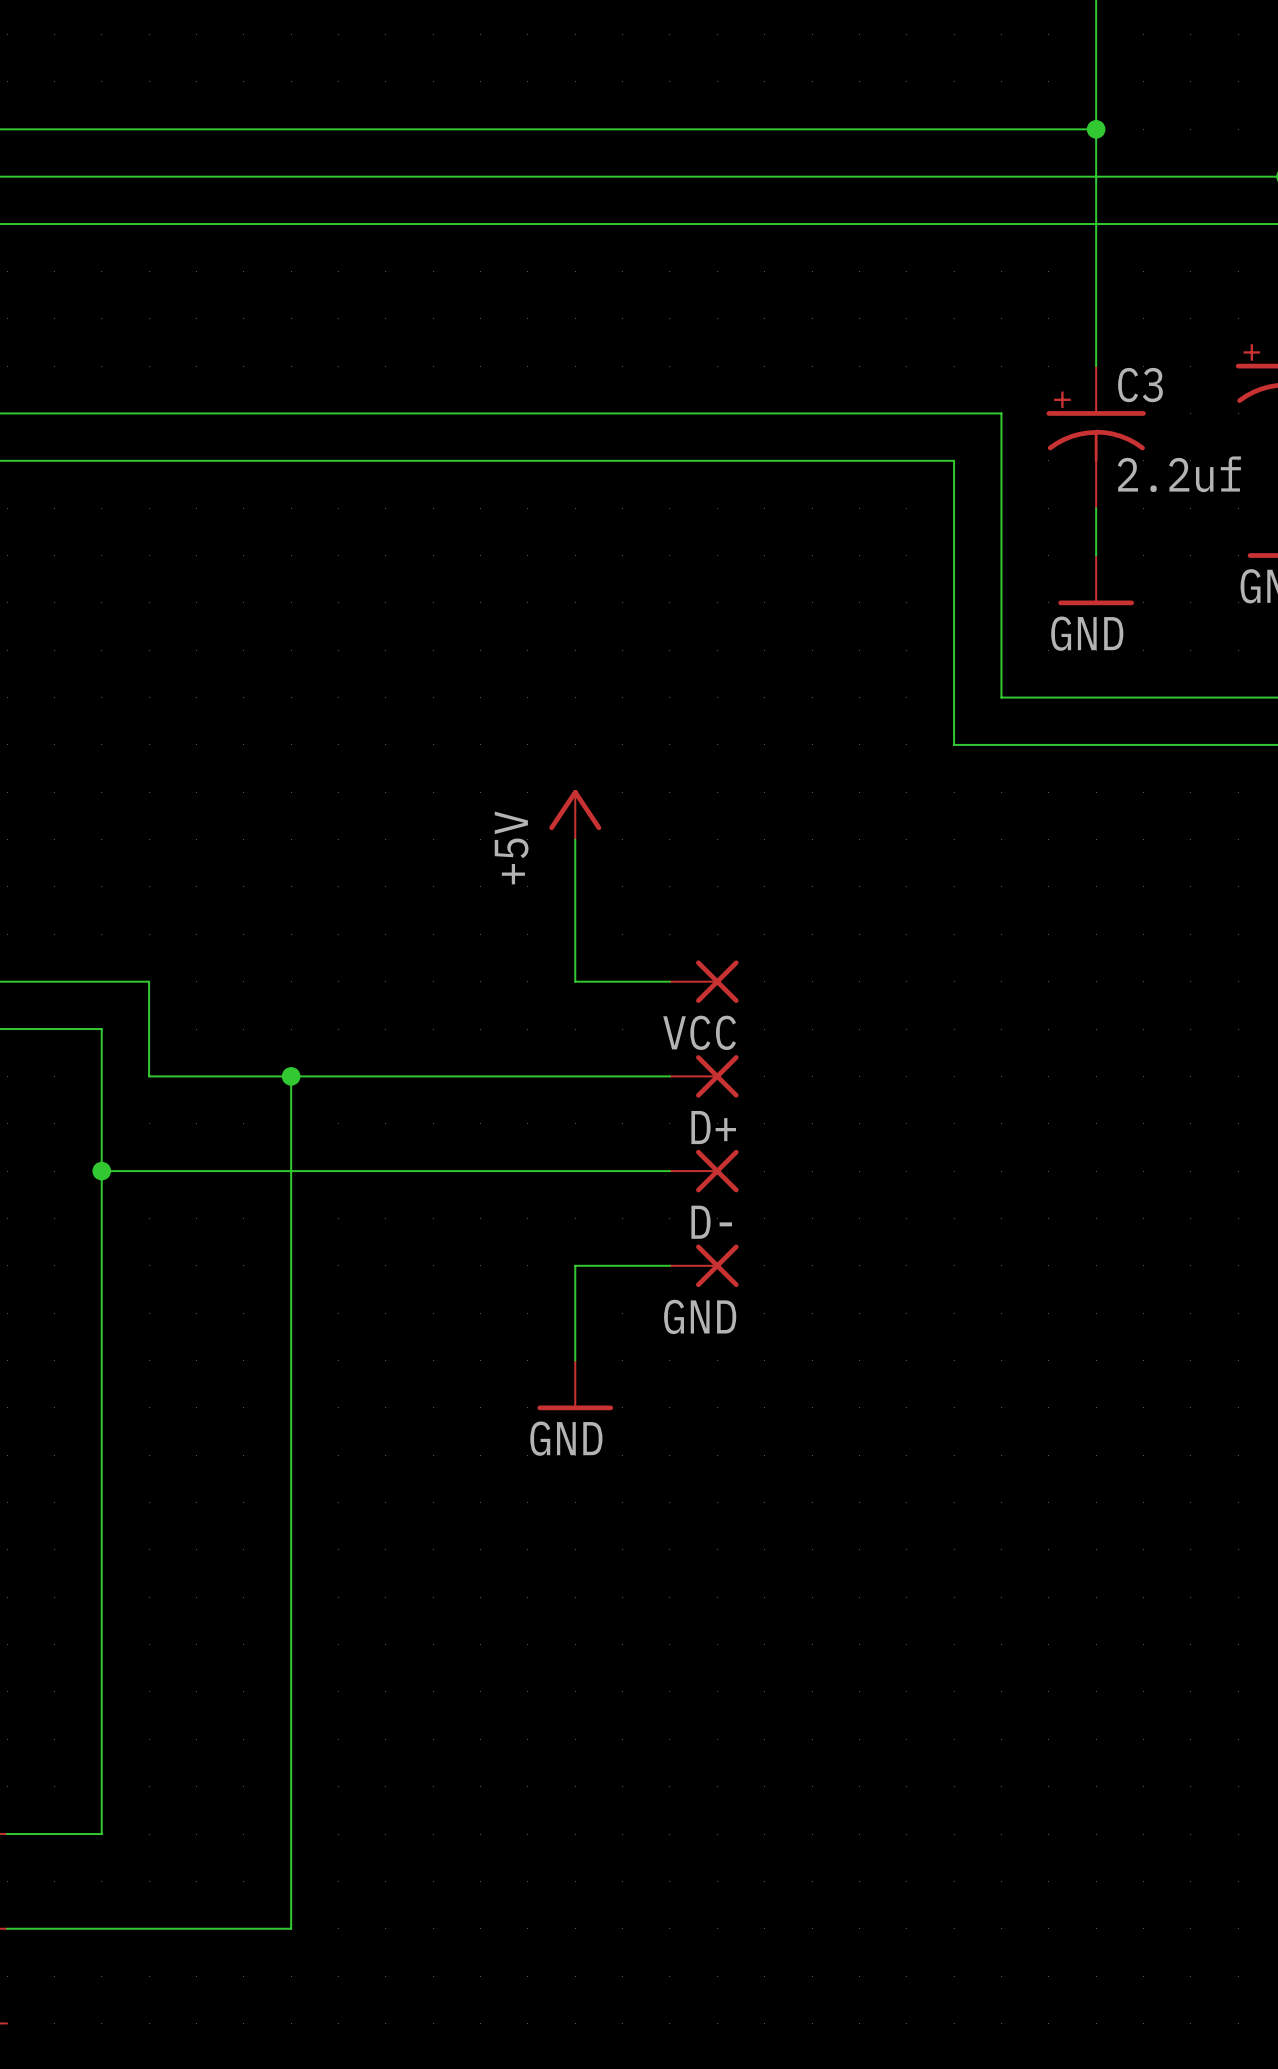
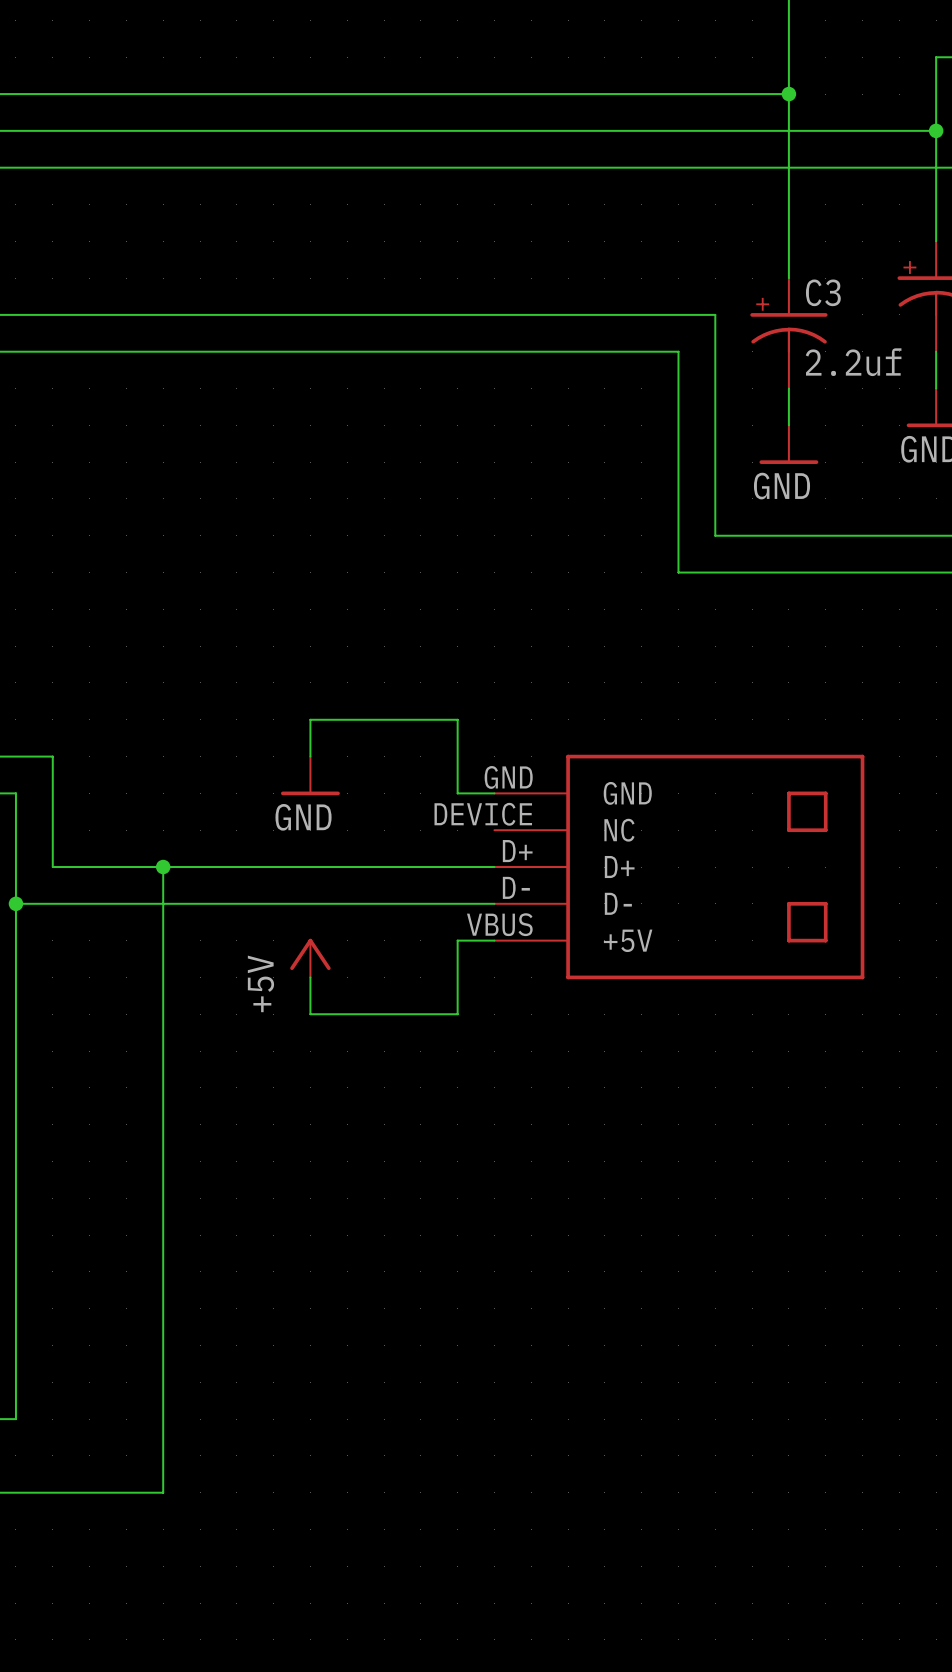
power symbol position: +5V (575, 814) -> +5V (310, 958)
wire: (575, 839) (575, 981) (669, 981) -> none
wire: none -> (310, 756) (310, 719) (457, 719) (457, 793) (494, 793)
VCC: (704, 981) -> none
wire: (149, 1076) (669, 1076) -> (52, 830) (52, 867) (494, 867)
wire: (291, 1076) (291, 1123) -> none
junction position: (291, 1076) -> (163, 867)
D+: (704, 1076) -> none
part: none -> (679, 867)
D-: (704, 1171) -> none
wire: none -> (494, 940) (457, 940) (457, 1014) (310, 1014) (310, 977)
wire: (669, 1265) (575, 1265) (575, 1360) -> none
GND: (704, 1265) -> none
power symbol position: GND (575, 1385) -> GND (310, 775)

